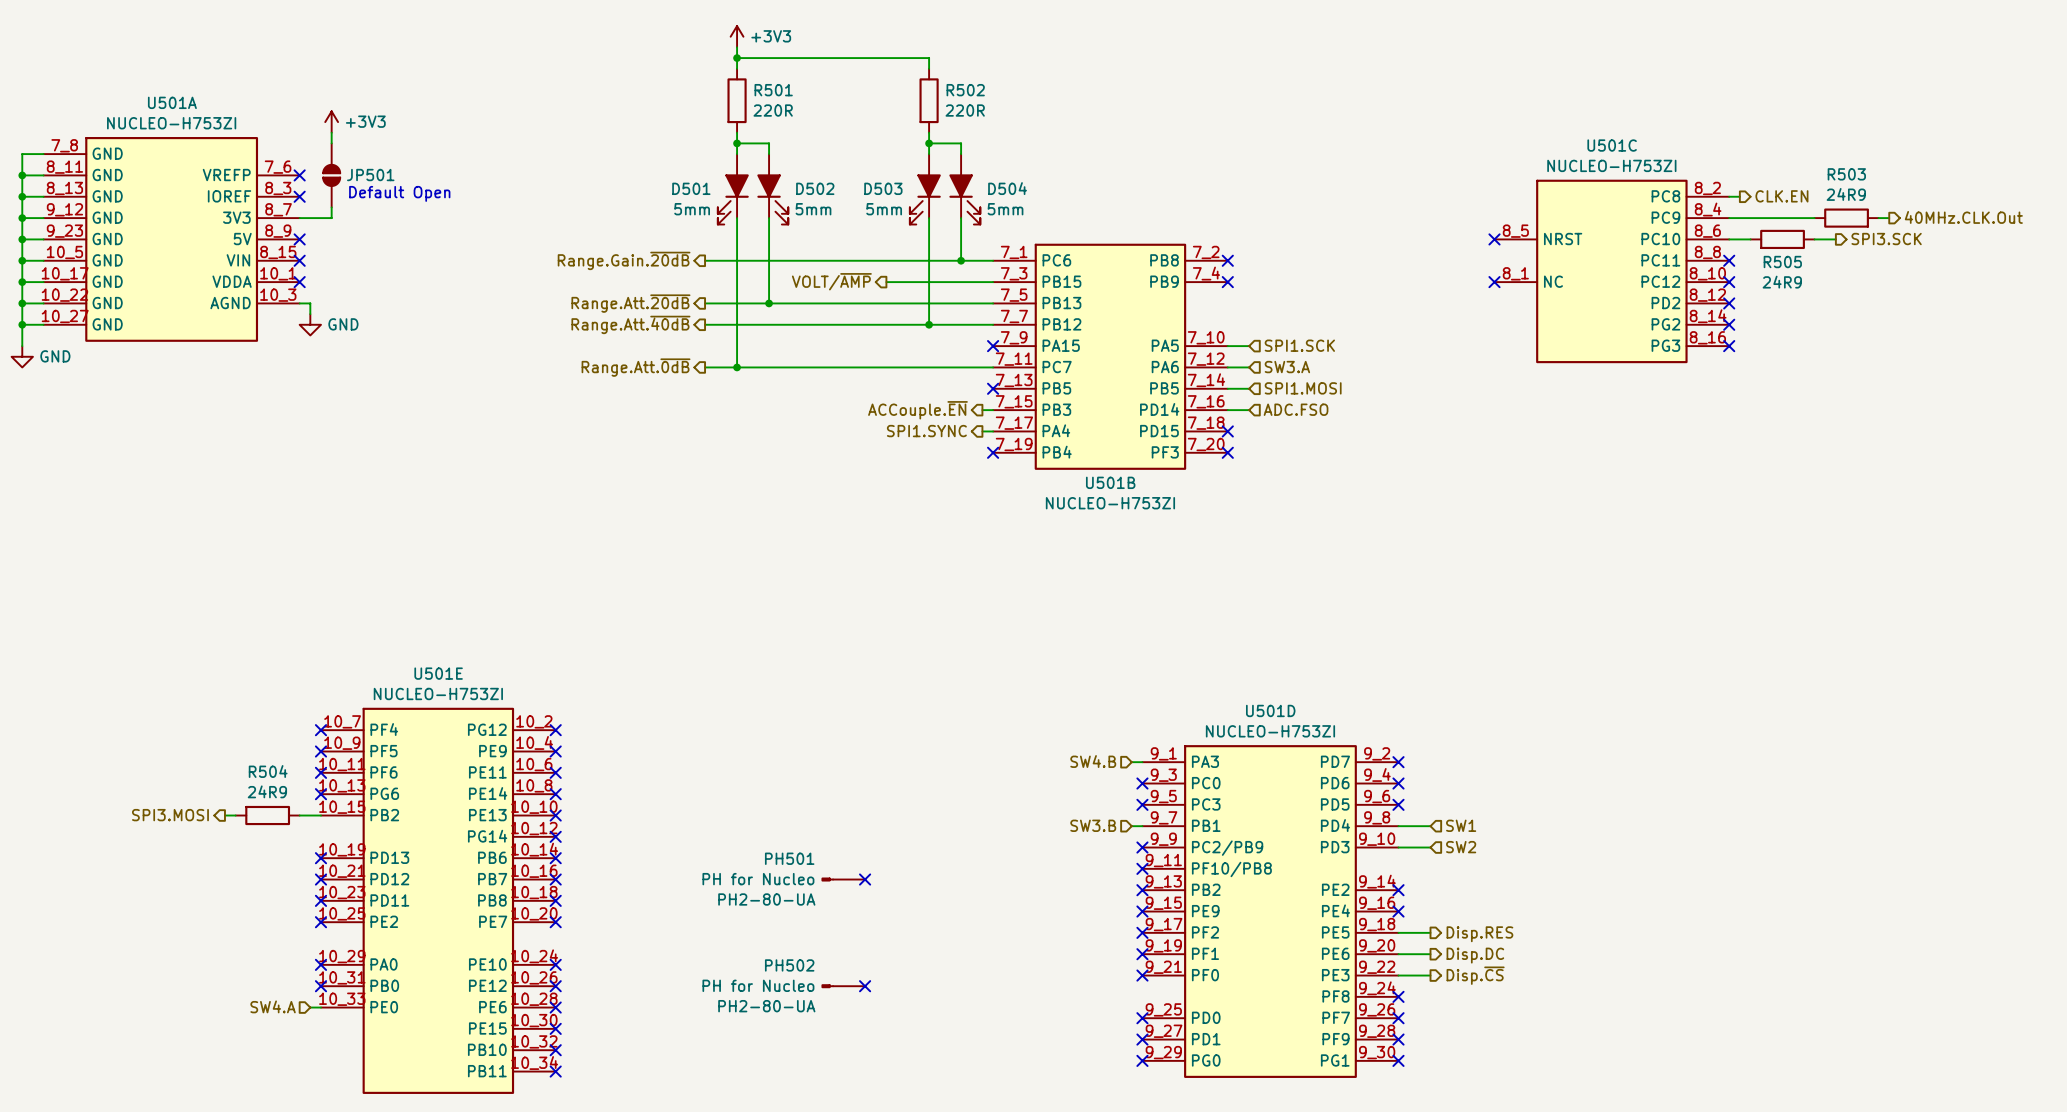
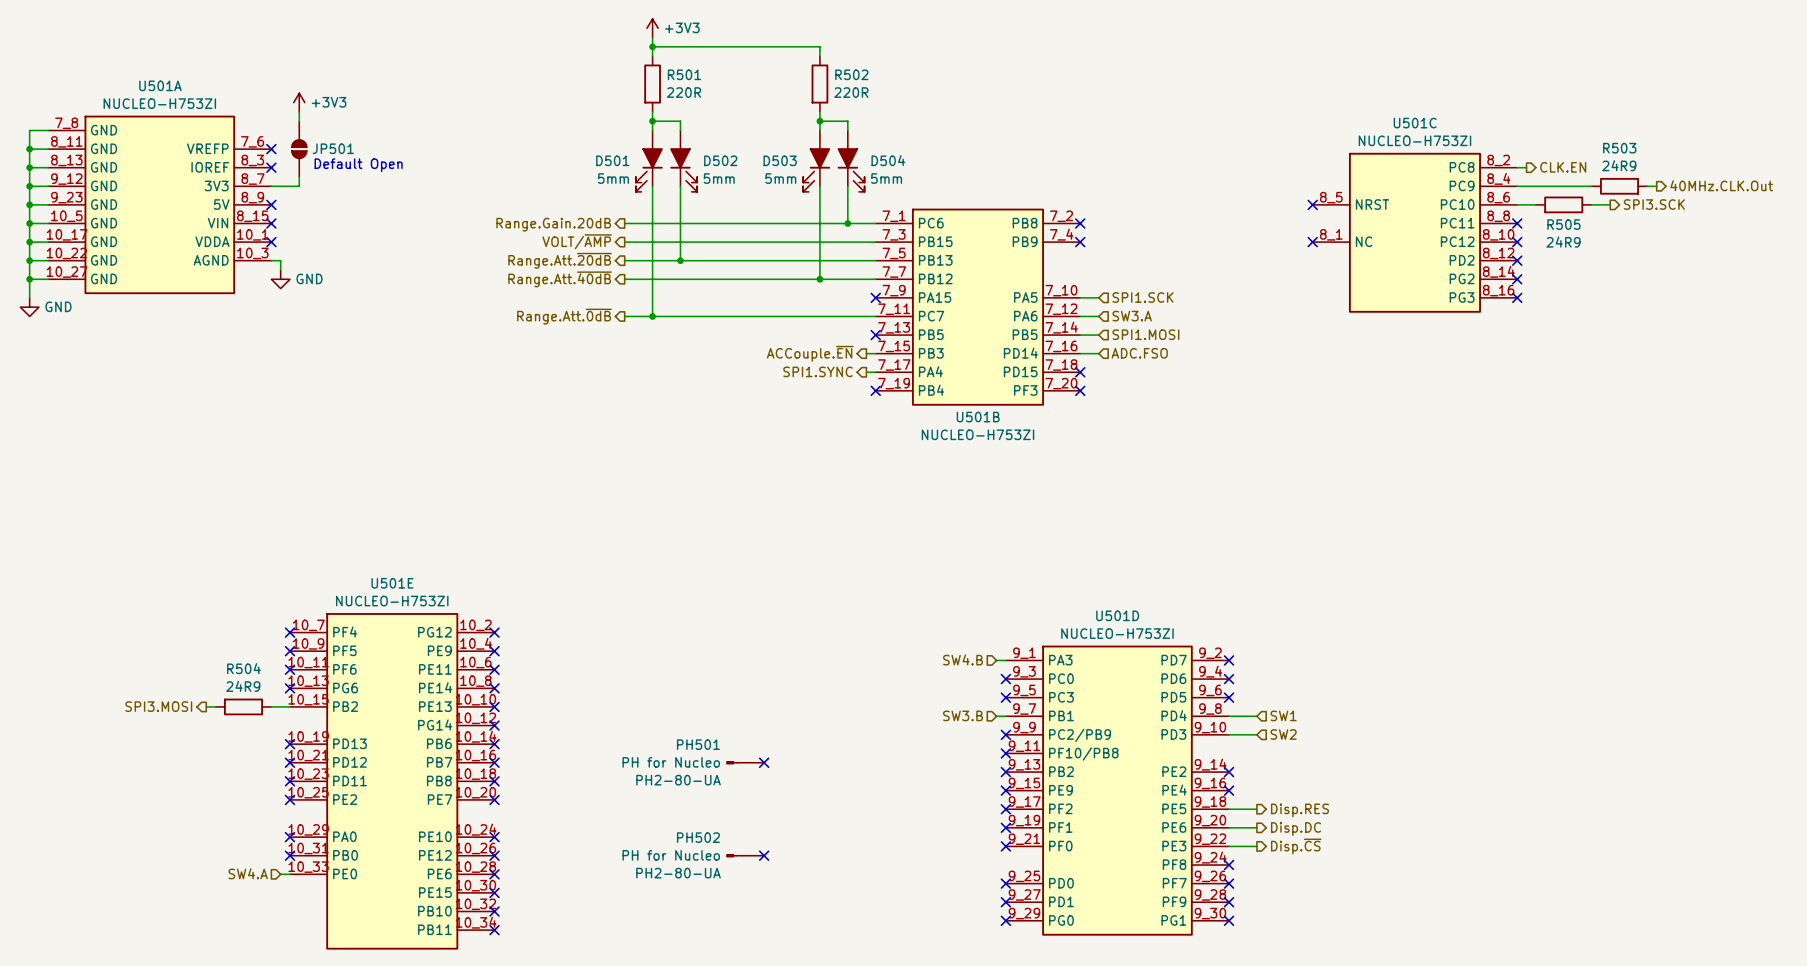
hierarchical label: Range.Gain.~{20dB} (624, 260) -> Range.Gain.20dB (553, 224)
hierarchical label position: VOLT/~{AMP} (831, 281) -> VOLT/~{AMP} (577, 241)
wire: none -> (624, 242) (782, 242)

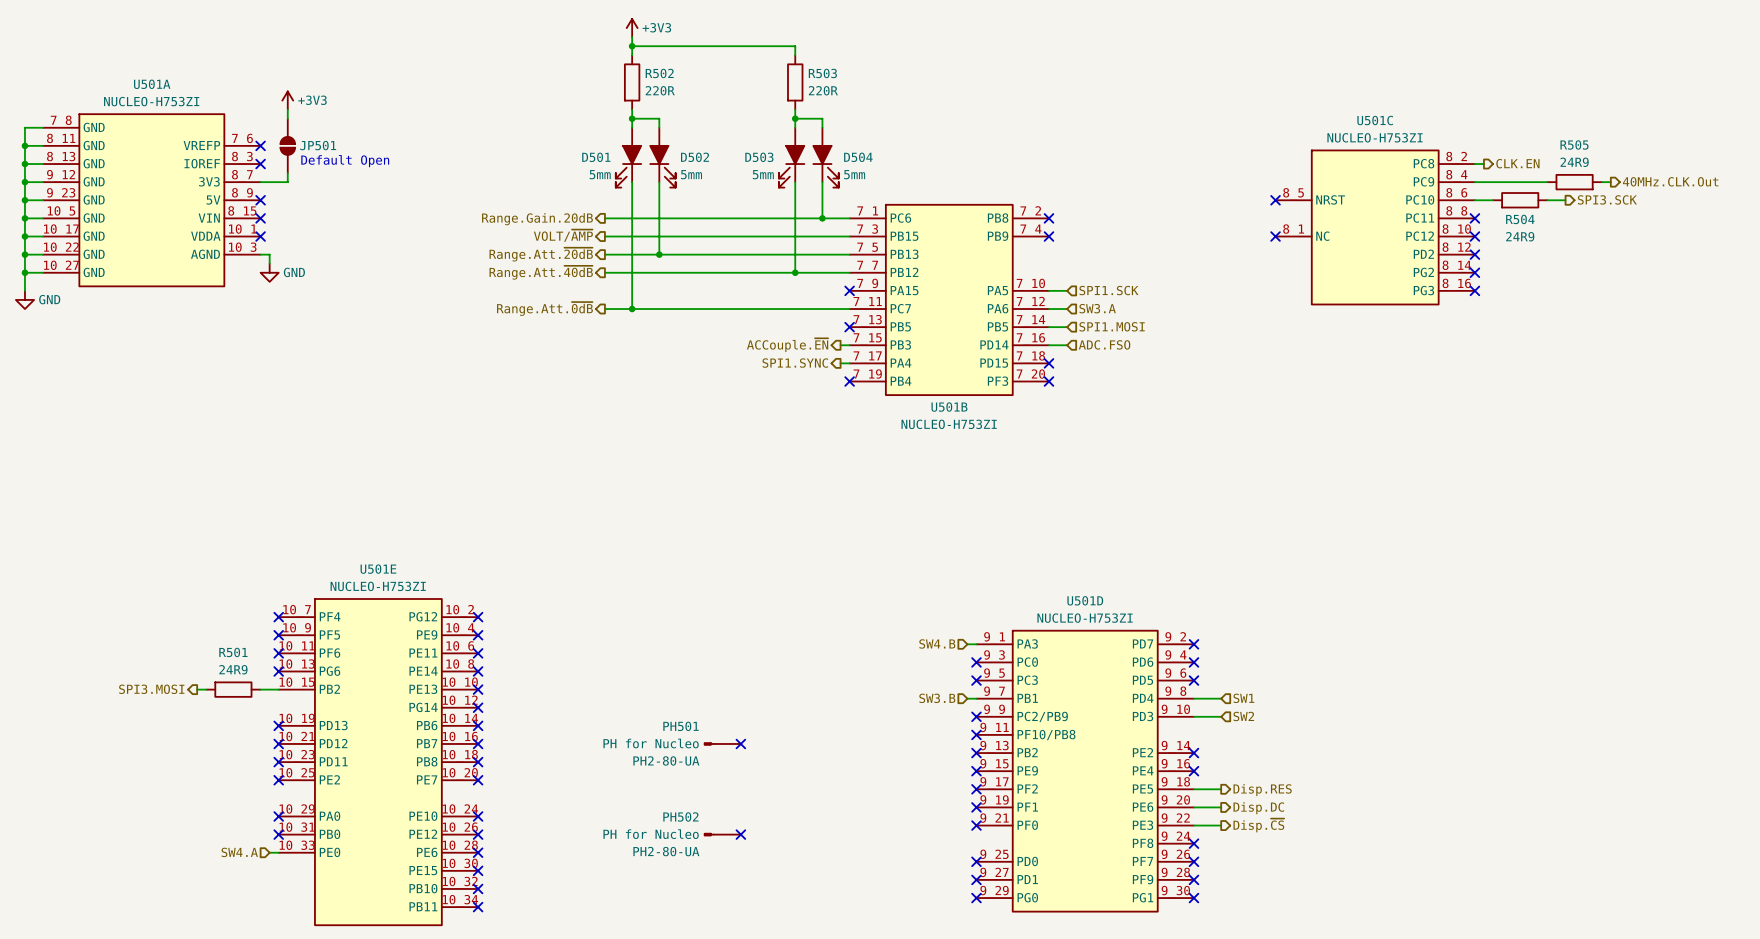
R501 name: R501 (684, 74) -> R502 (659, 73)
R502 name: R502 (851, 74) -> R503 (822, 73)
R503 name: R503 (1619, 148) -> R505 (1574, 144)
R505 name: R505 (1563, 224) -> R504 (1520, 219)
R504 name: R504 (243, 668) -> R501 (233, 652)

